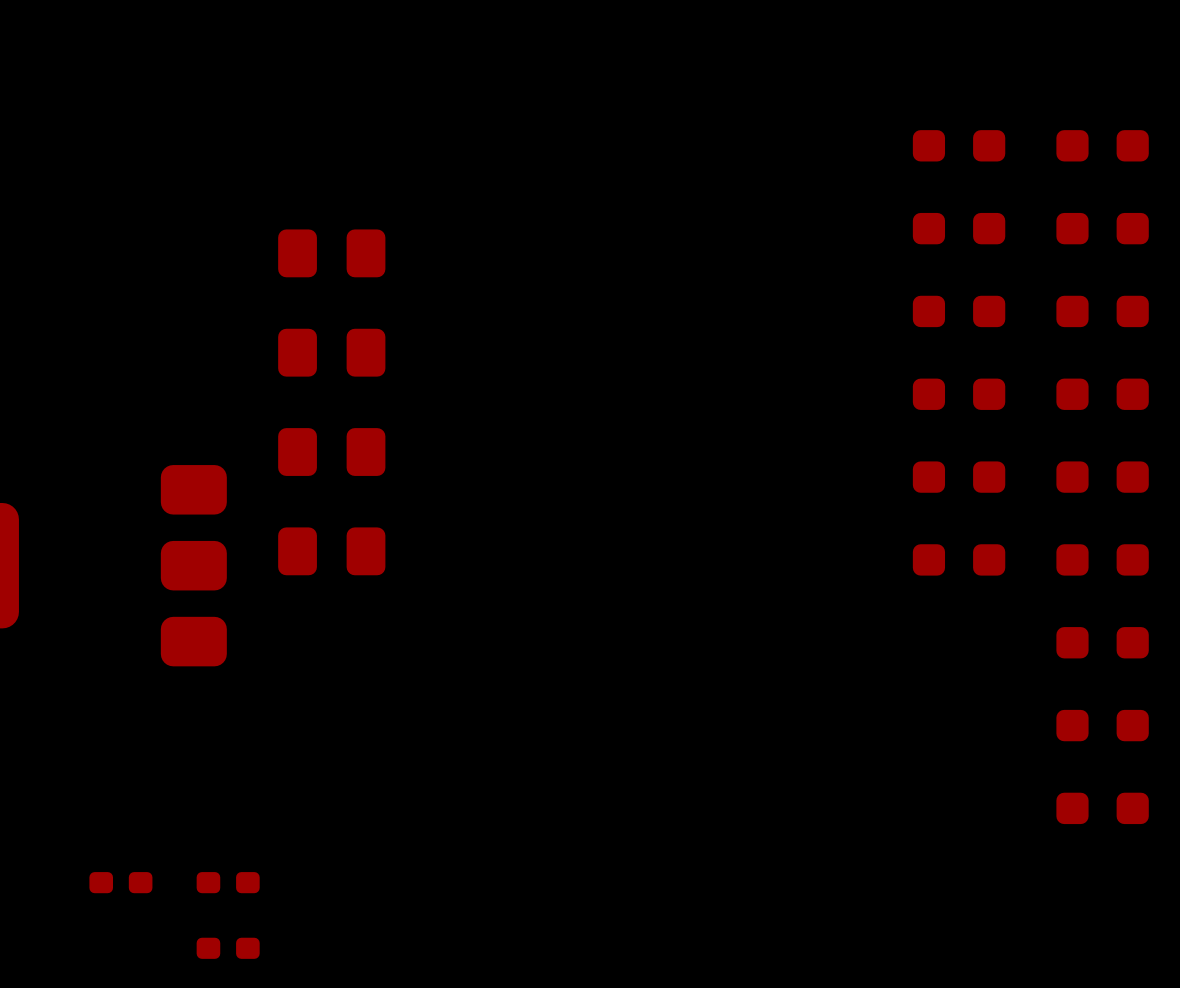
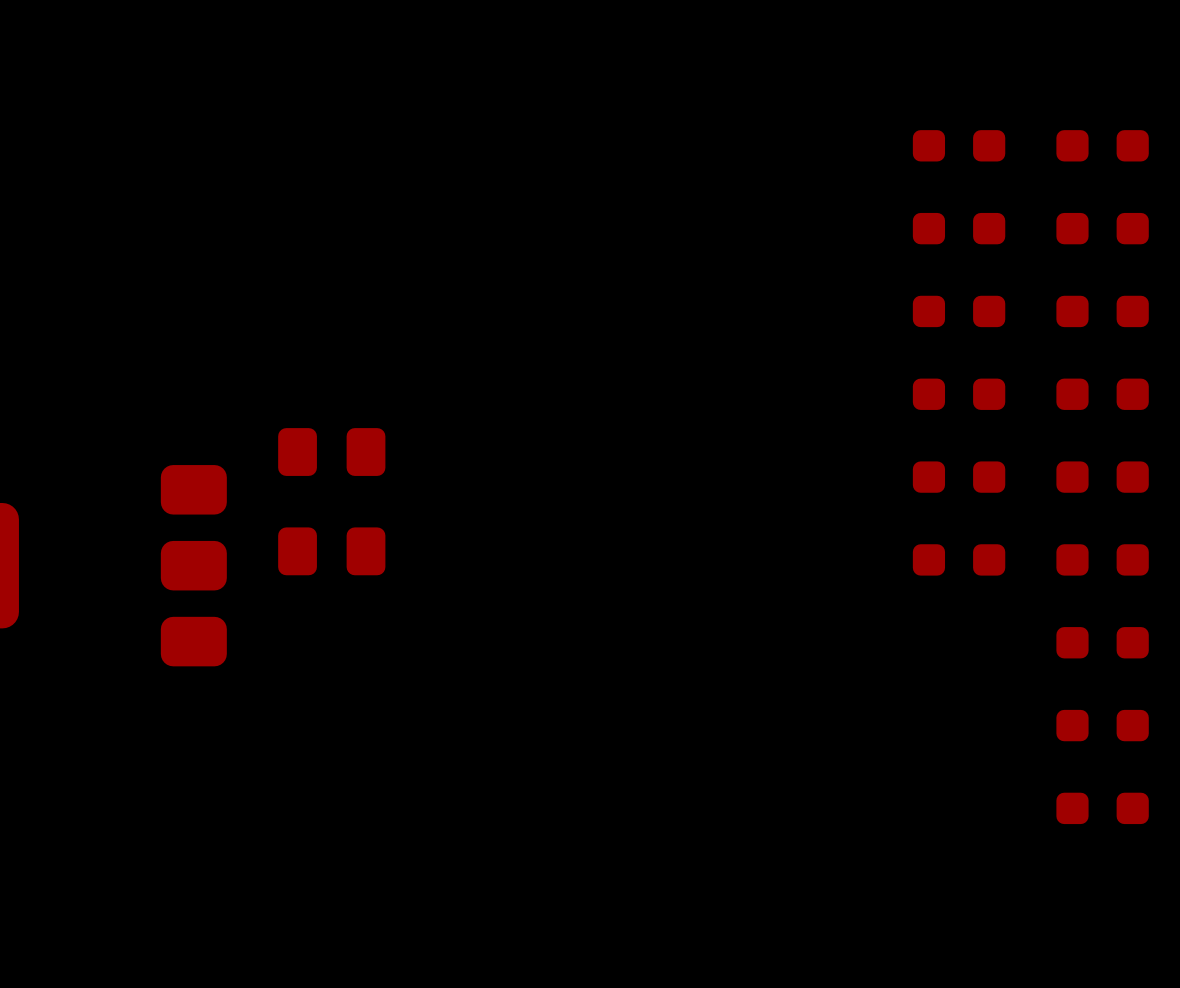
part: (331, 253) -> none
part: (331, 352) -> none
part: (120, 882) -> none
part: (228, 882) -> none
part: (228, 948) -> none

